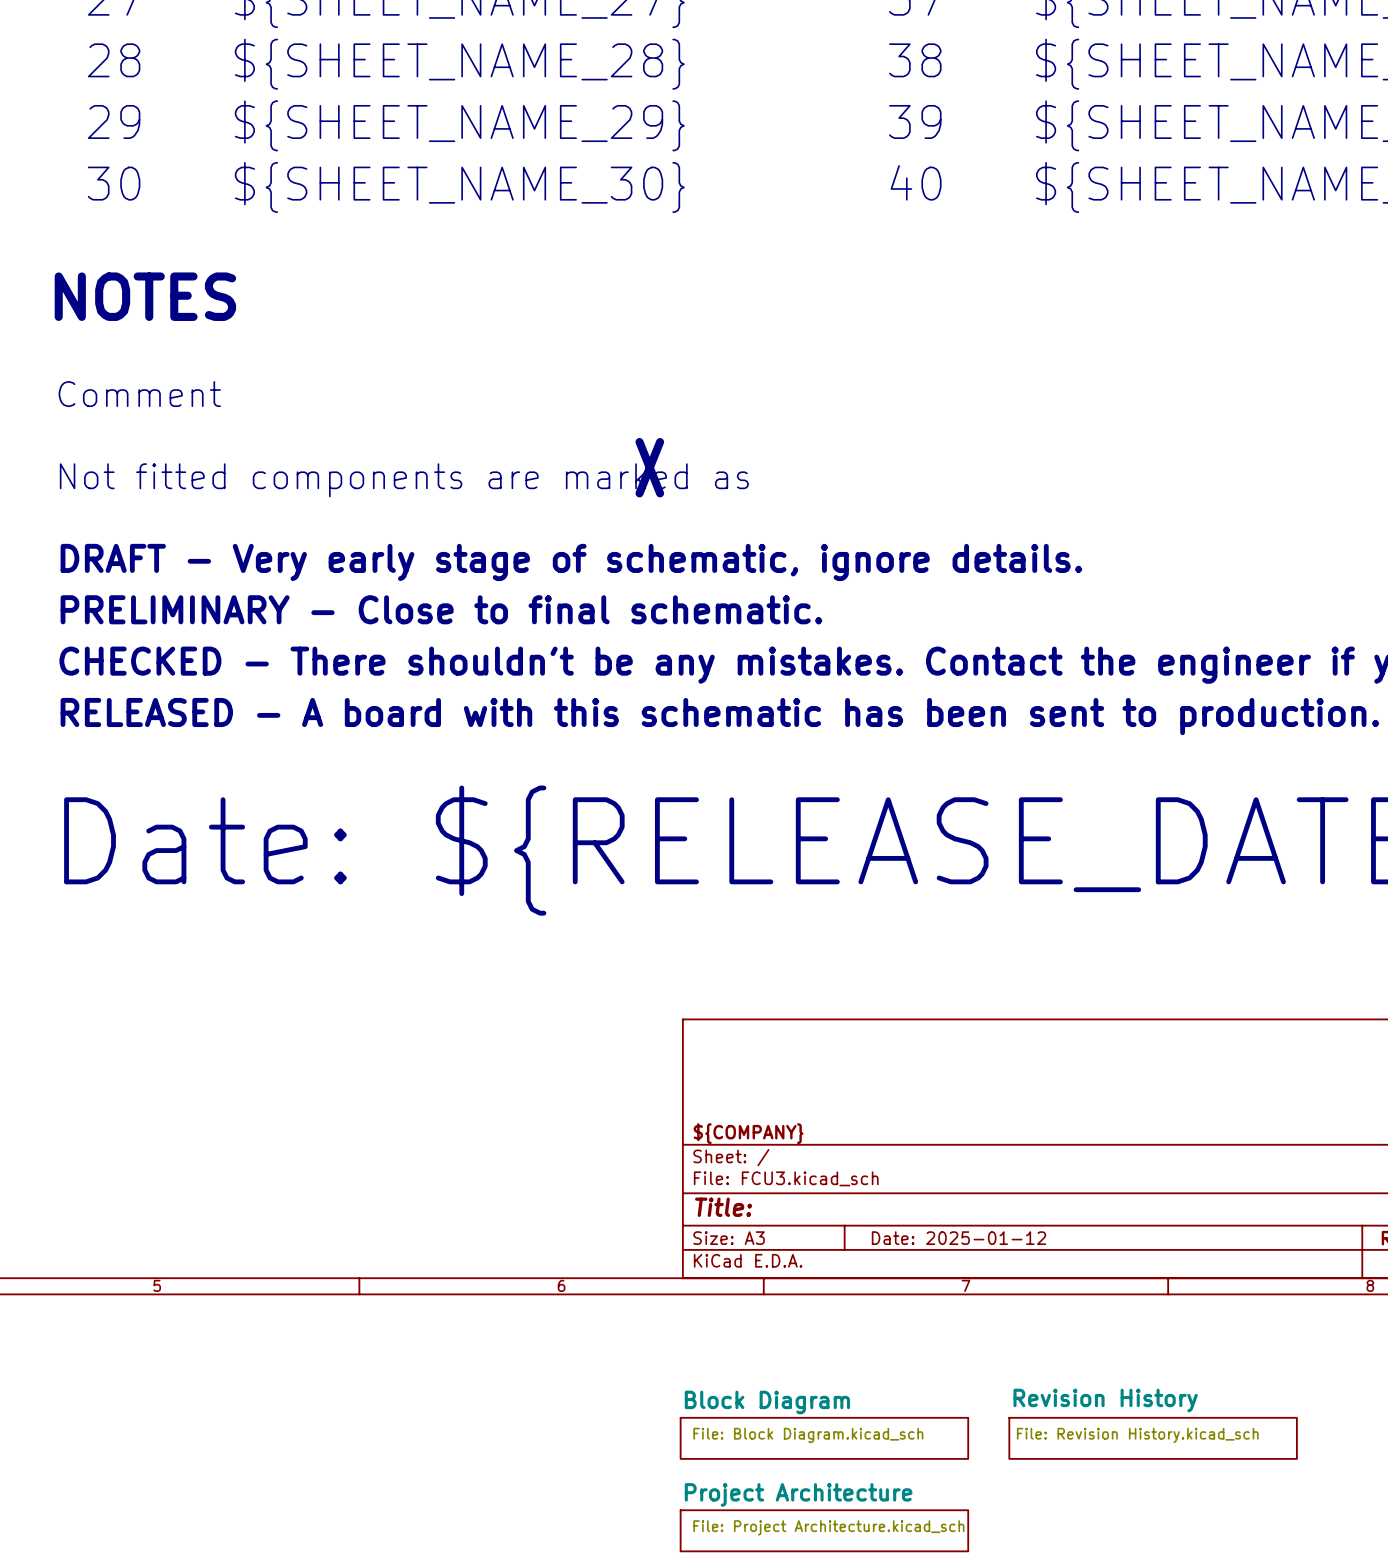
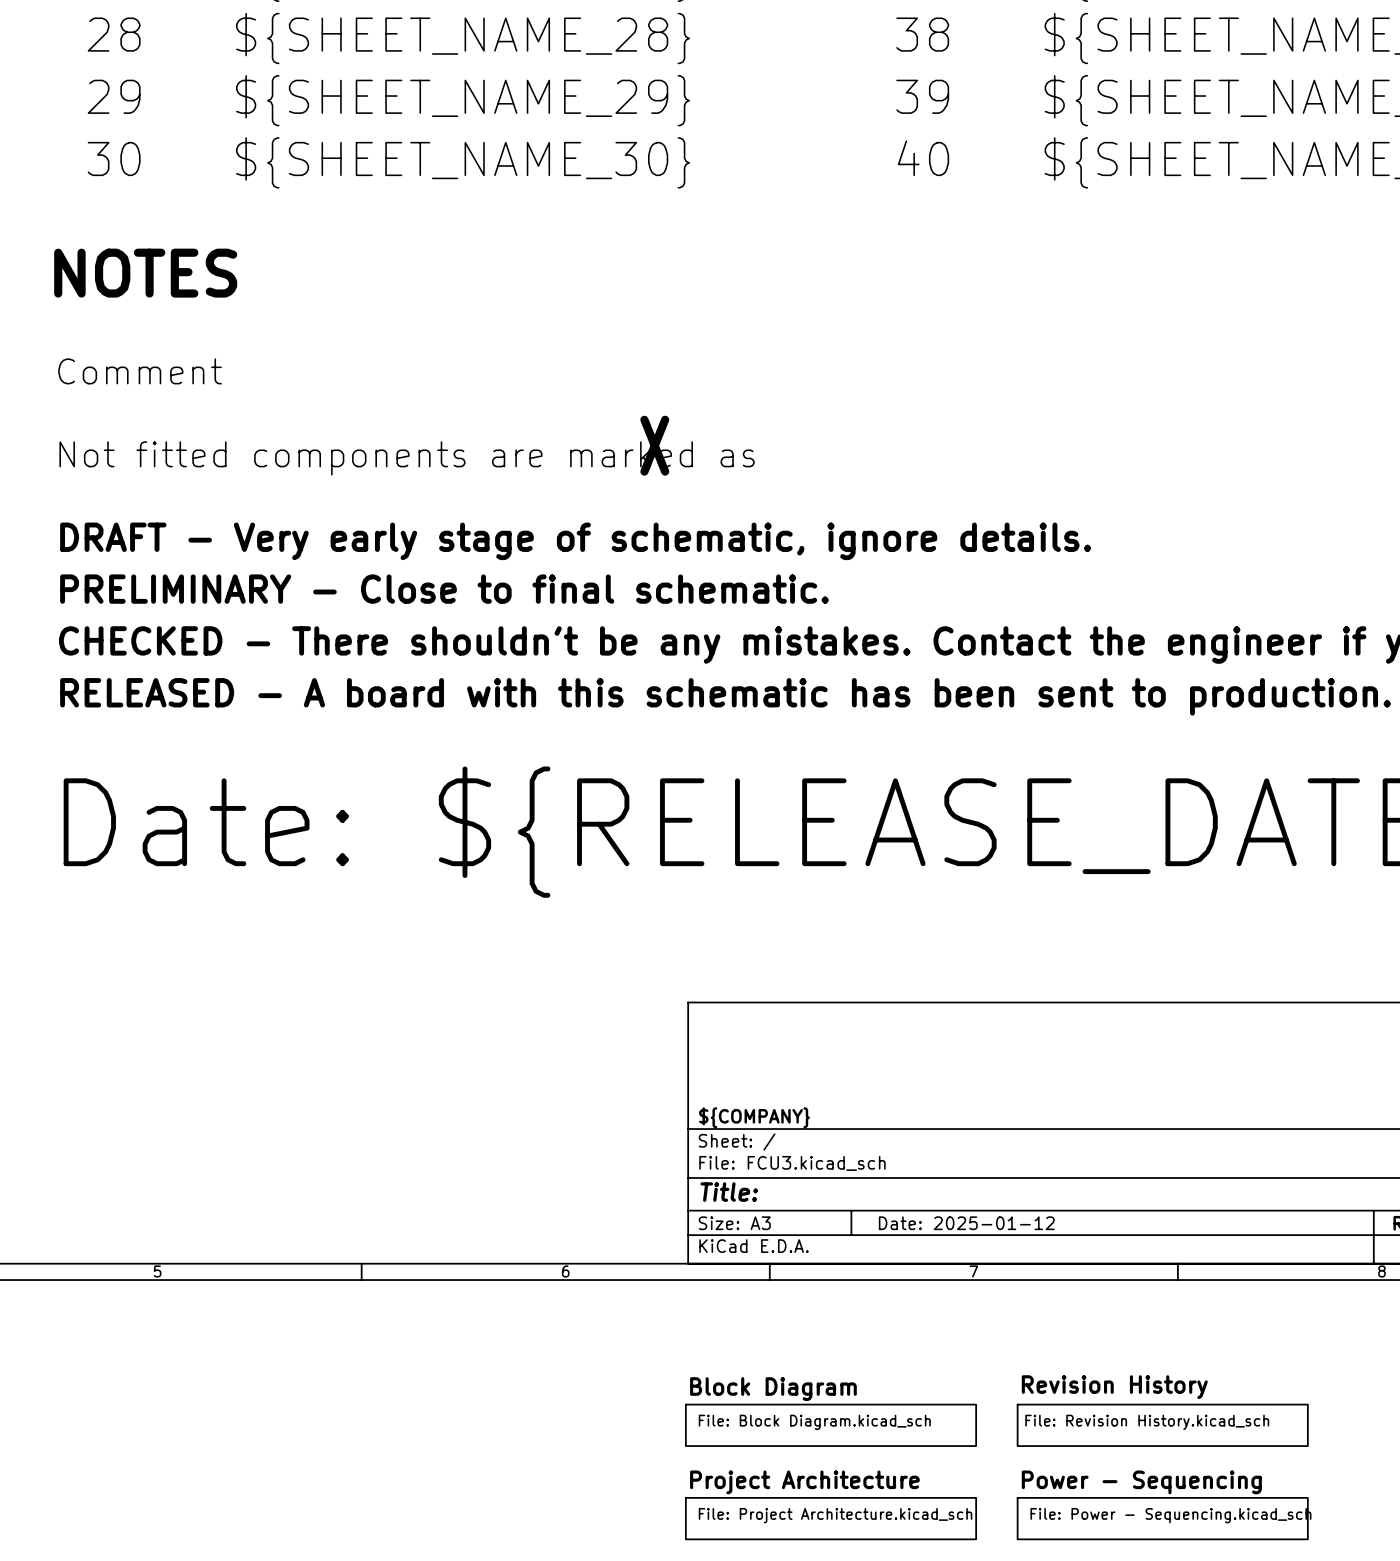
sheet Power - Sequencing: none -> File: Power - Sequencing.kicad_sch (1162, 1518)

